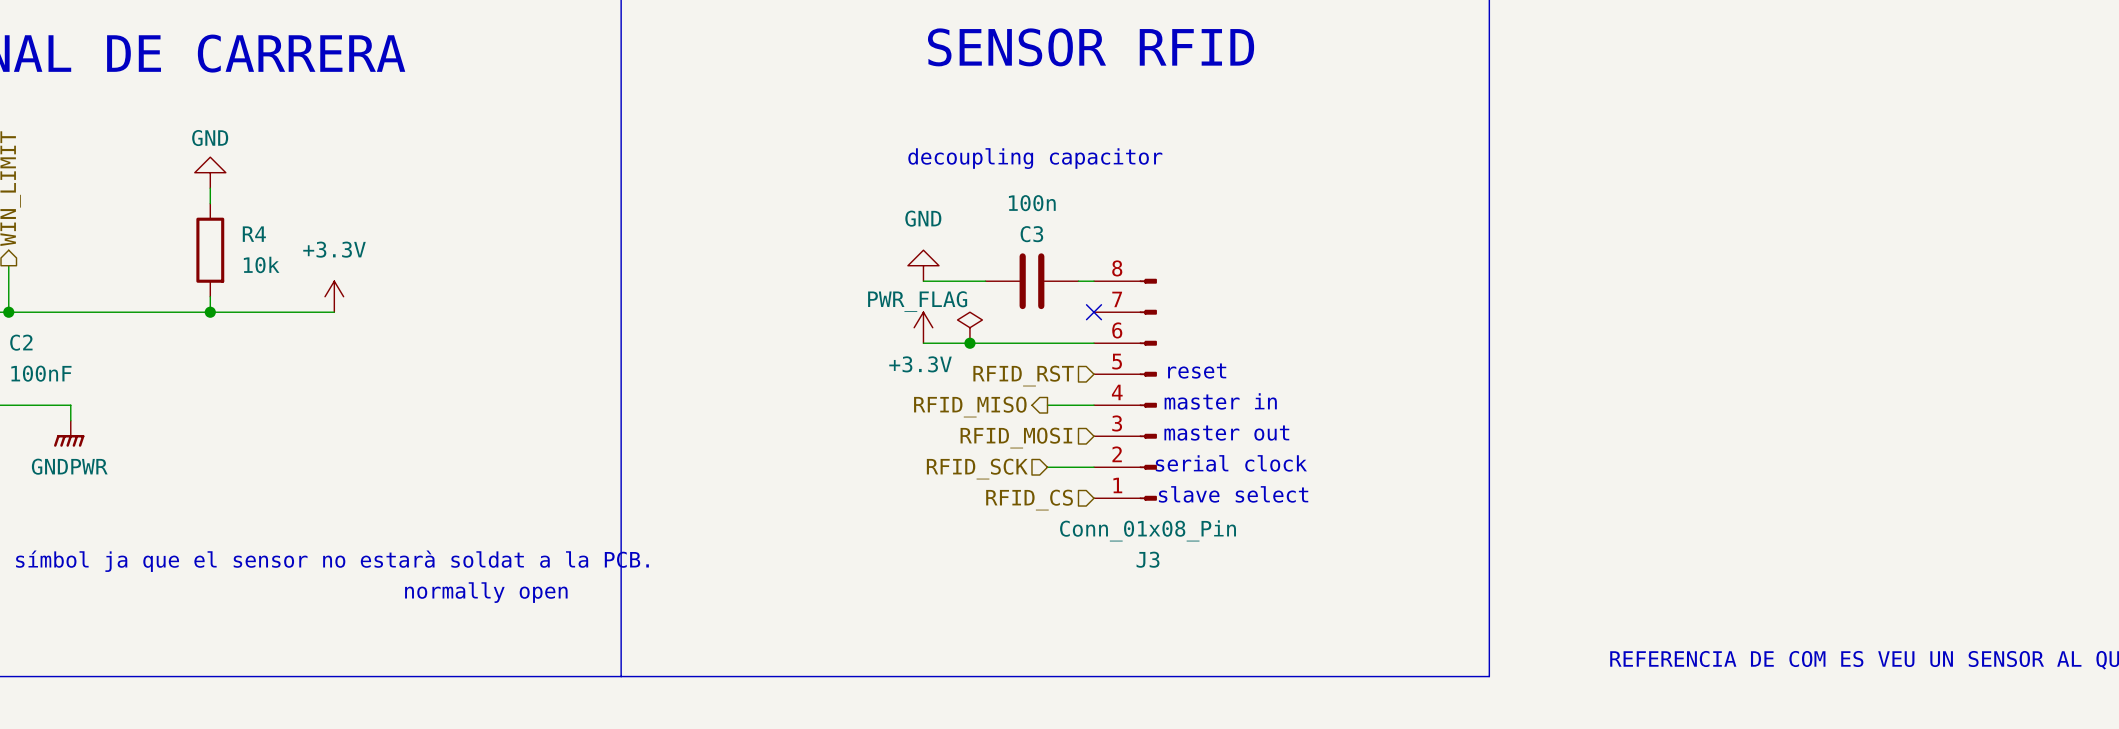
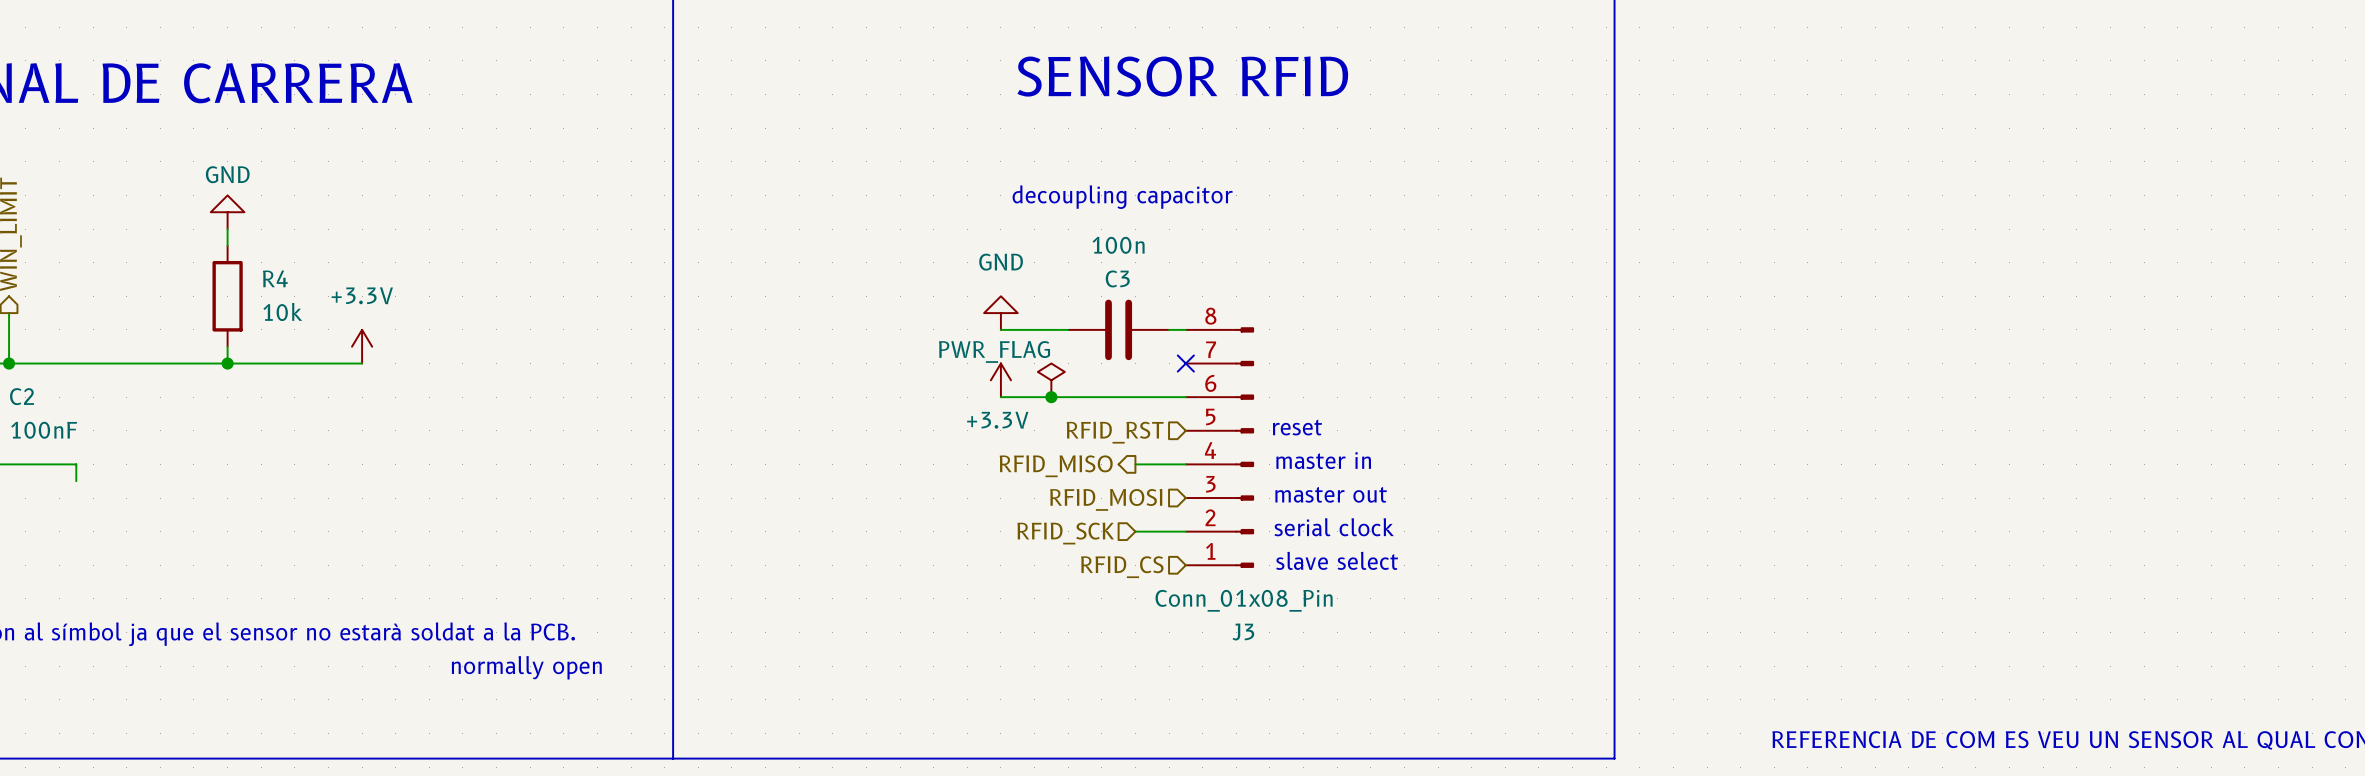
power symbol: GNDPWR (69, 433) -> none

